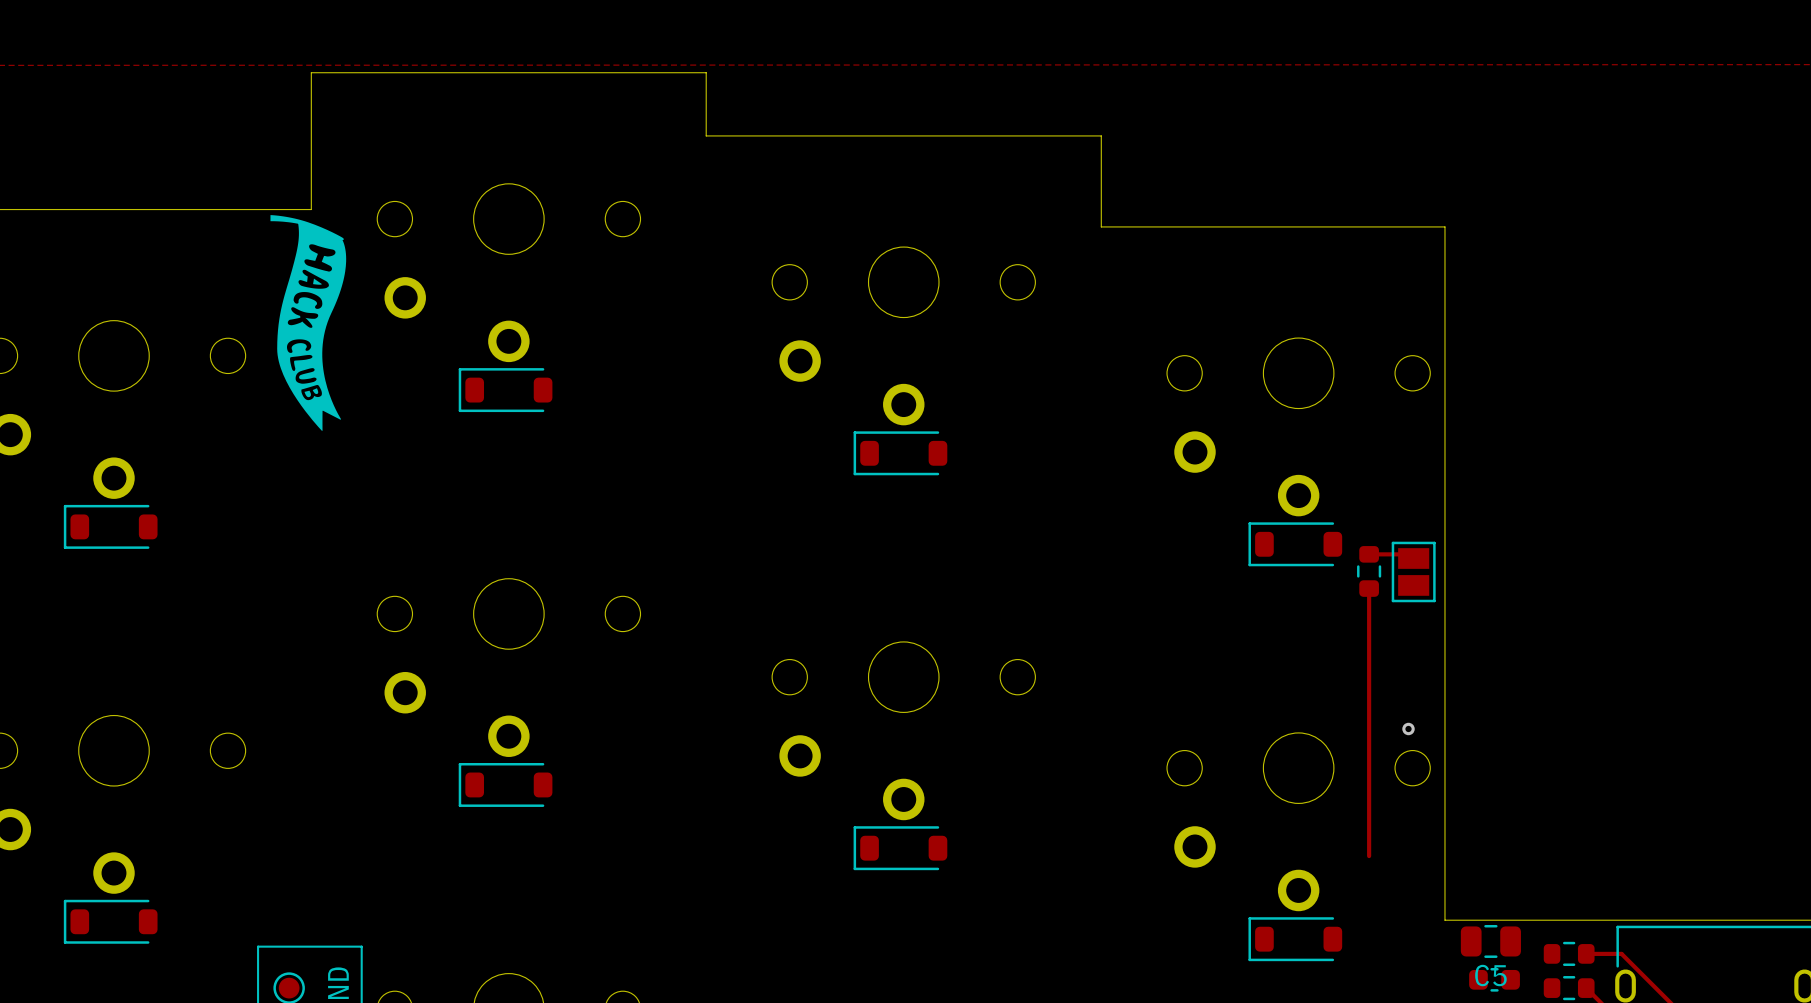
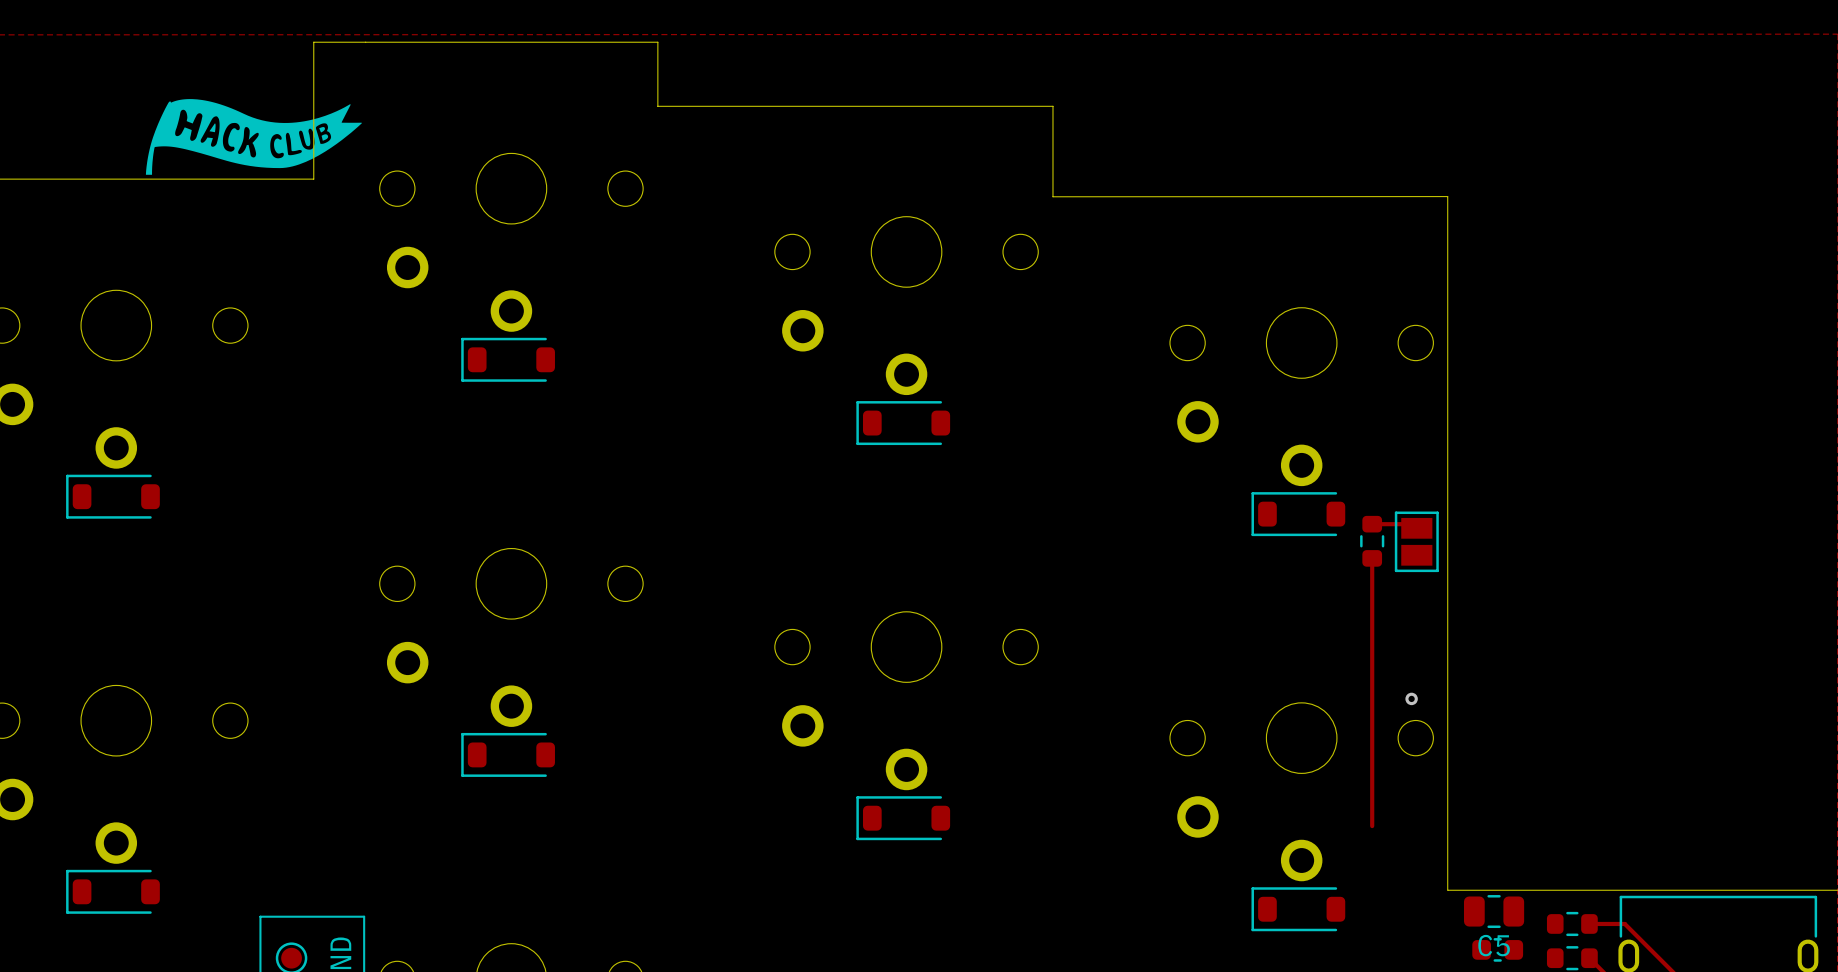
board edge: (655, 72) (706, 72) (706, 135) (1101, 135) (1101, 226) (1444, 226) (1444, 920) -> (657, 42) (657, 106) (1052, 106) (1052, 196) (1447, 196) (1447, 890)
drawing: none -> [145, 99, 362, 175]
drawing: [270, 215, 347, 431] -> none

